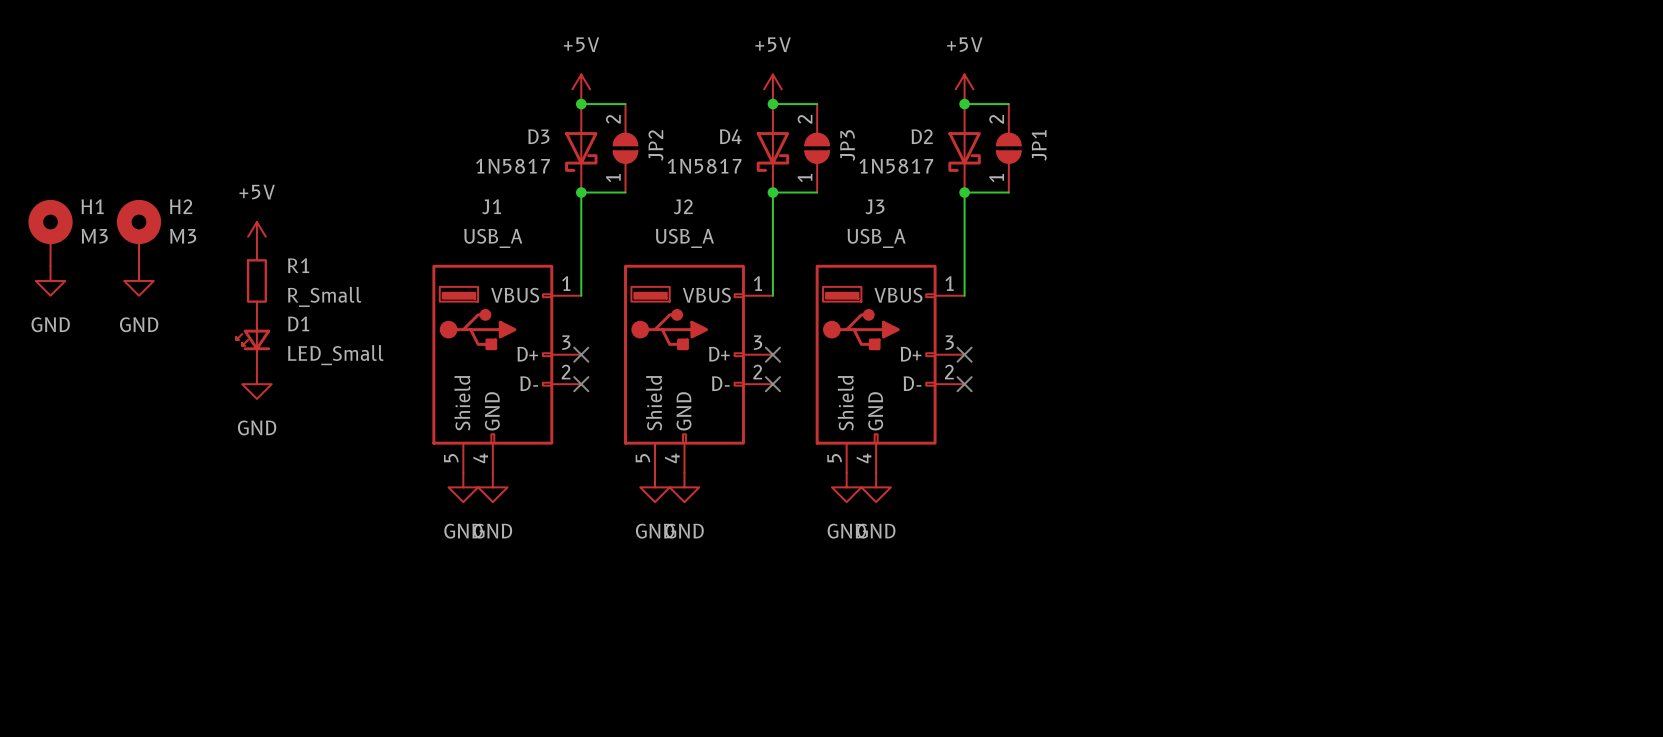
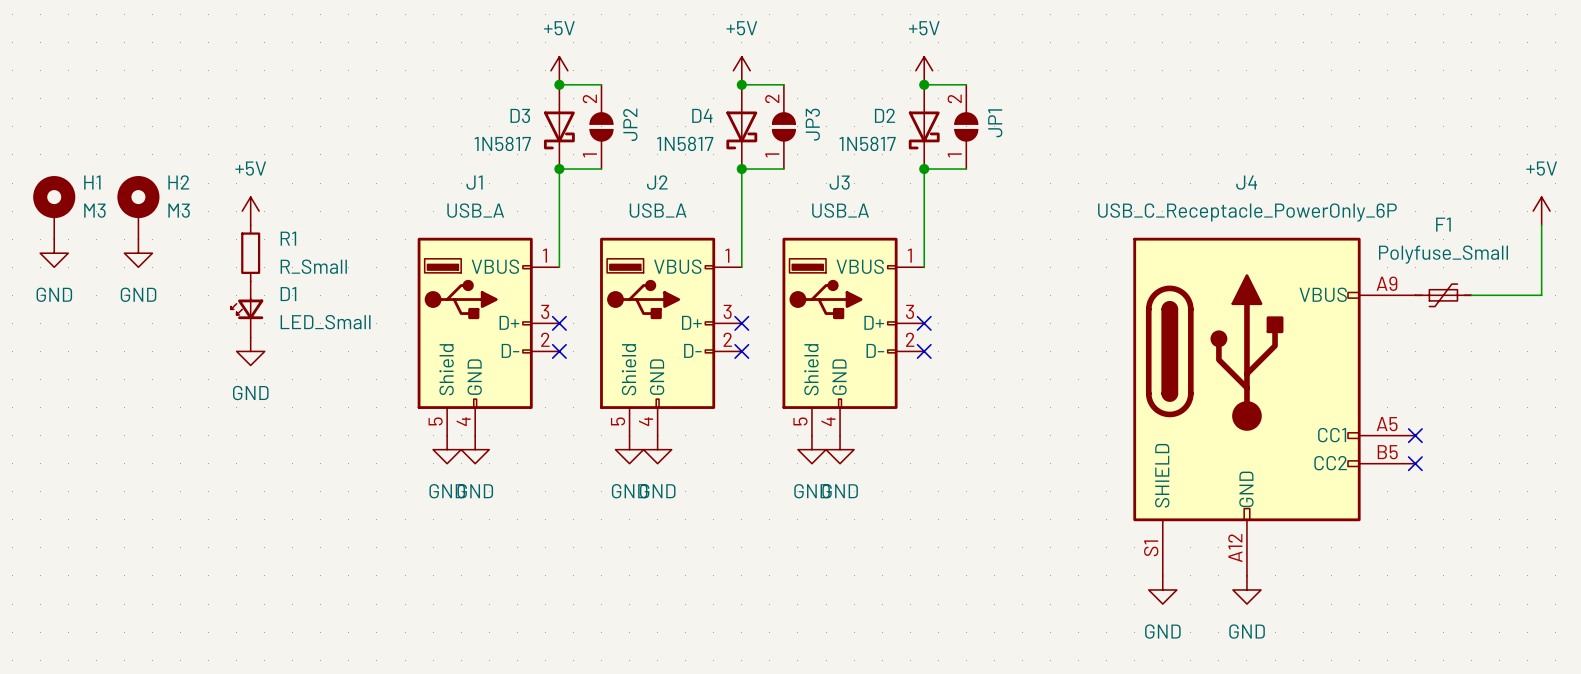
power symbol: none -> +5V (1541, 211)
wire: none -> (1541, 225) (1541, 295) (1471, 295)
F1: none -> Polyfuse_Small (1443, 295)
J4: none -> USB_C_Receptacle_PowerOnly_6P (1274, 406)
no-connect mark: none -> (1415, 435)
no-connect mark: none -> (1415, 463)
power symbol: none -> GND (1162, 589)
power symbol: none -> GND (1246, 589)

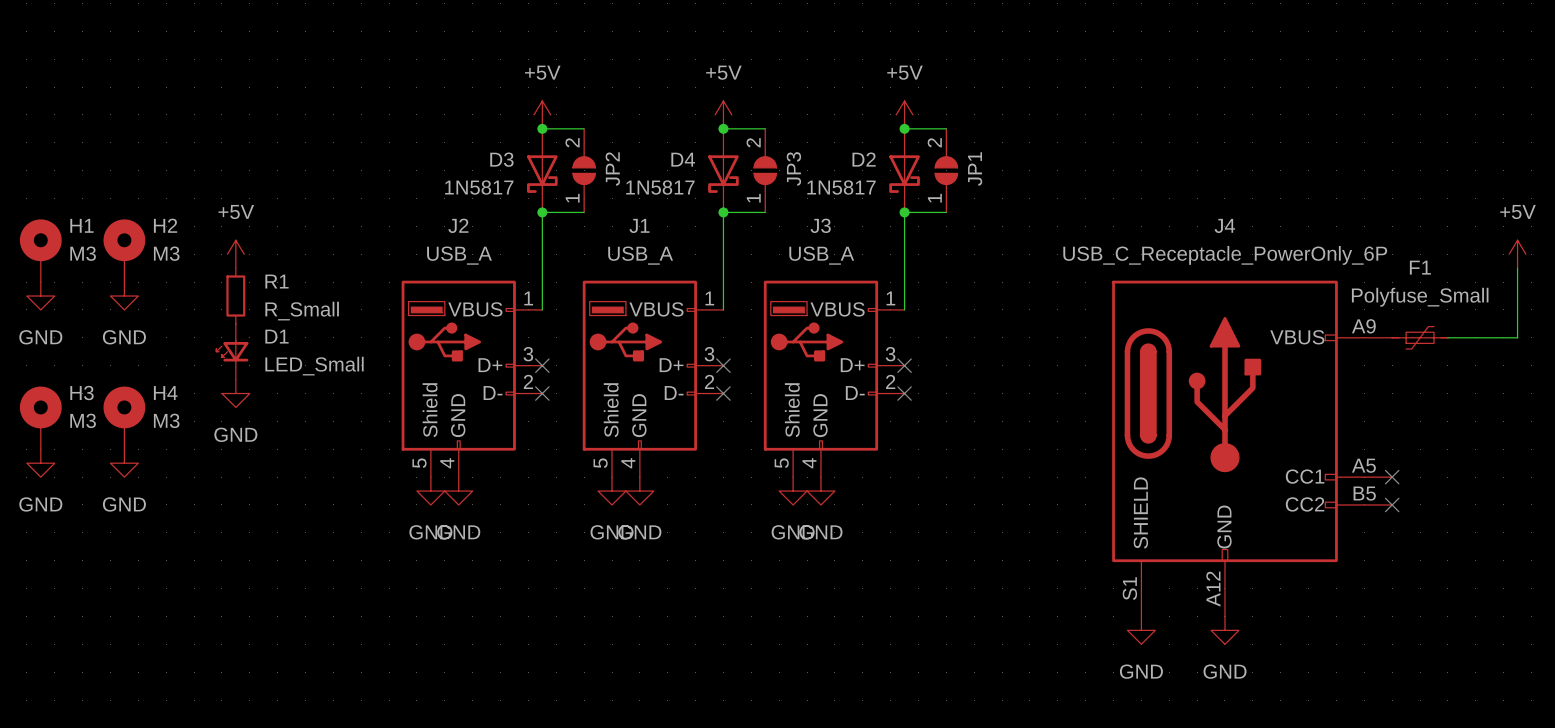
J1 name: J1 (474, 182) -> J2 (458, 225)
J2 name: J2 (657, 182) -> J1 (639, 225)
H3: none -> M3 (40, 417)
H4: none -> M3 (124, 417)
power symbol: none -> GND (40, 463)
power symbol: none -> GND (124, 463)

